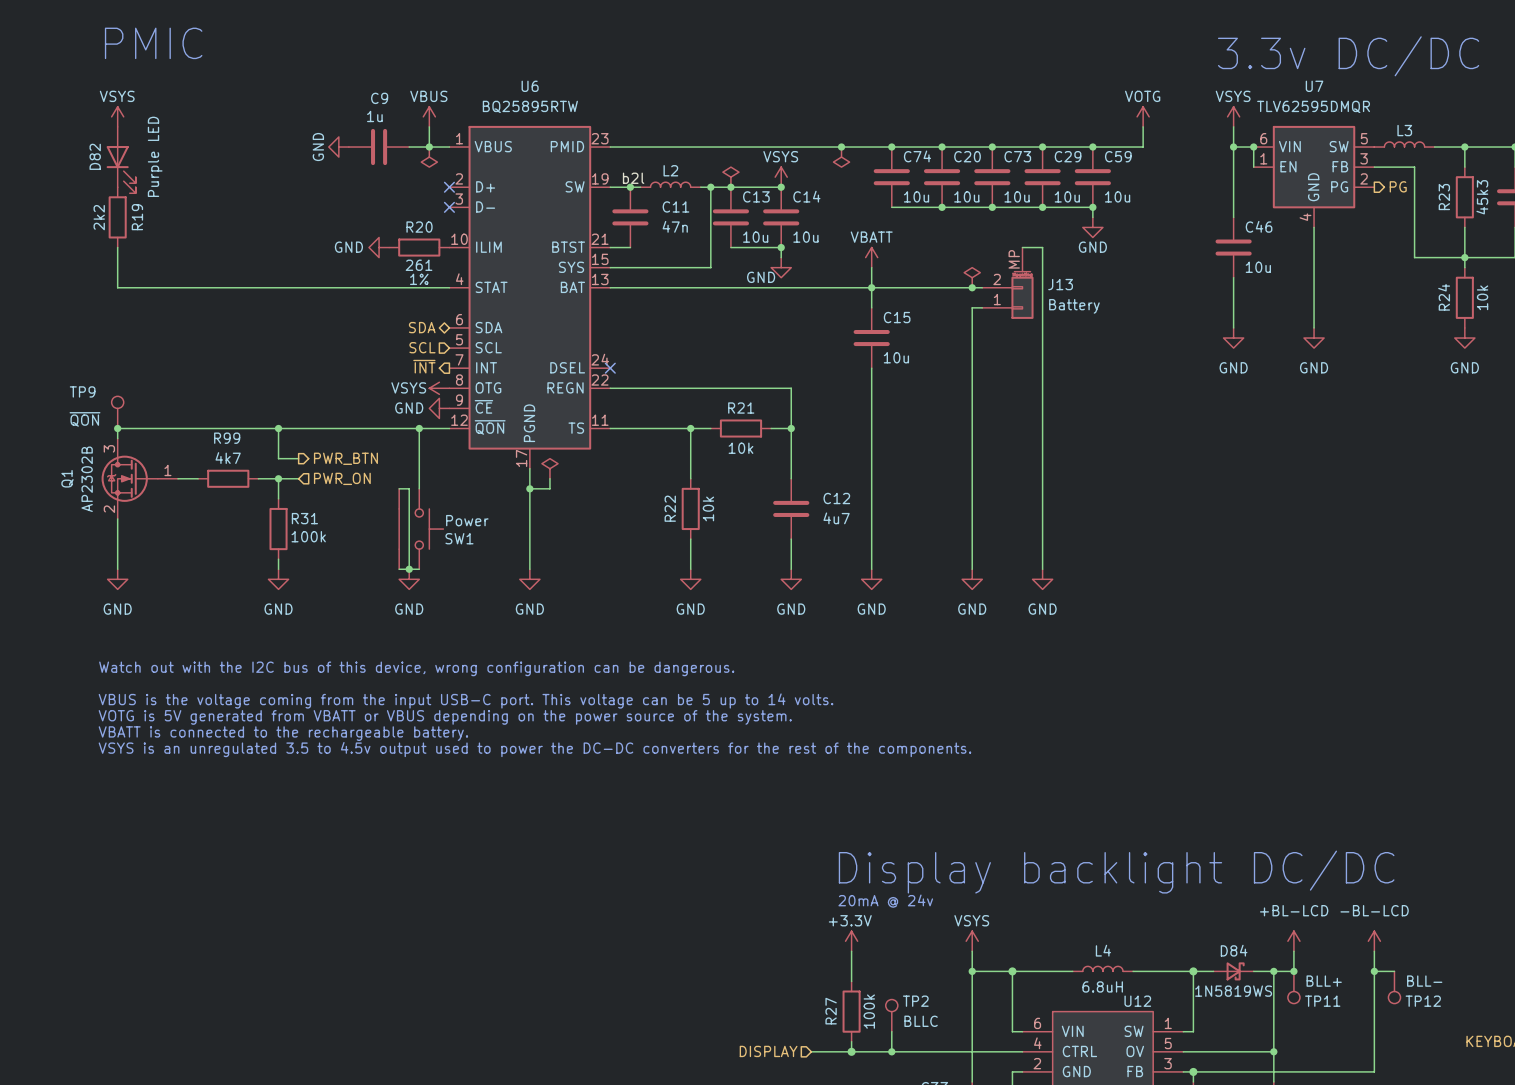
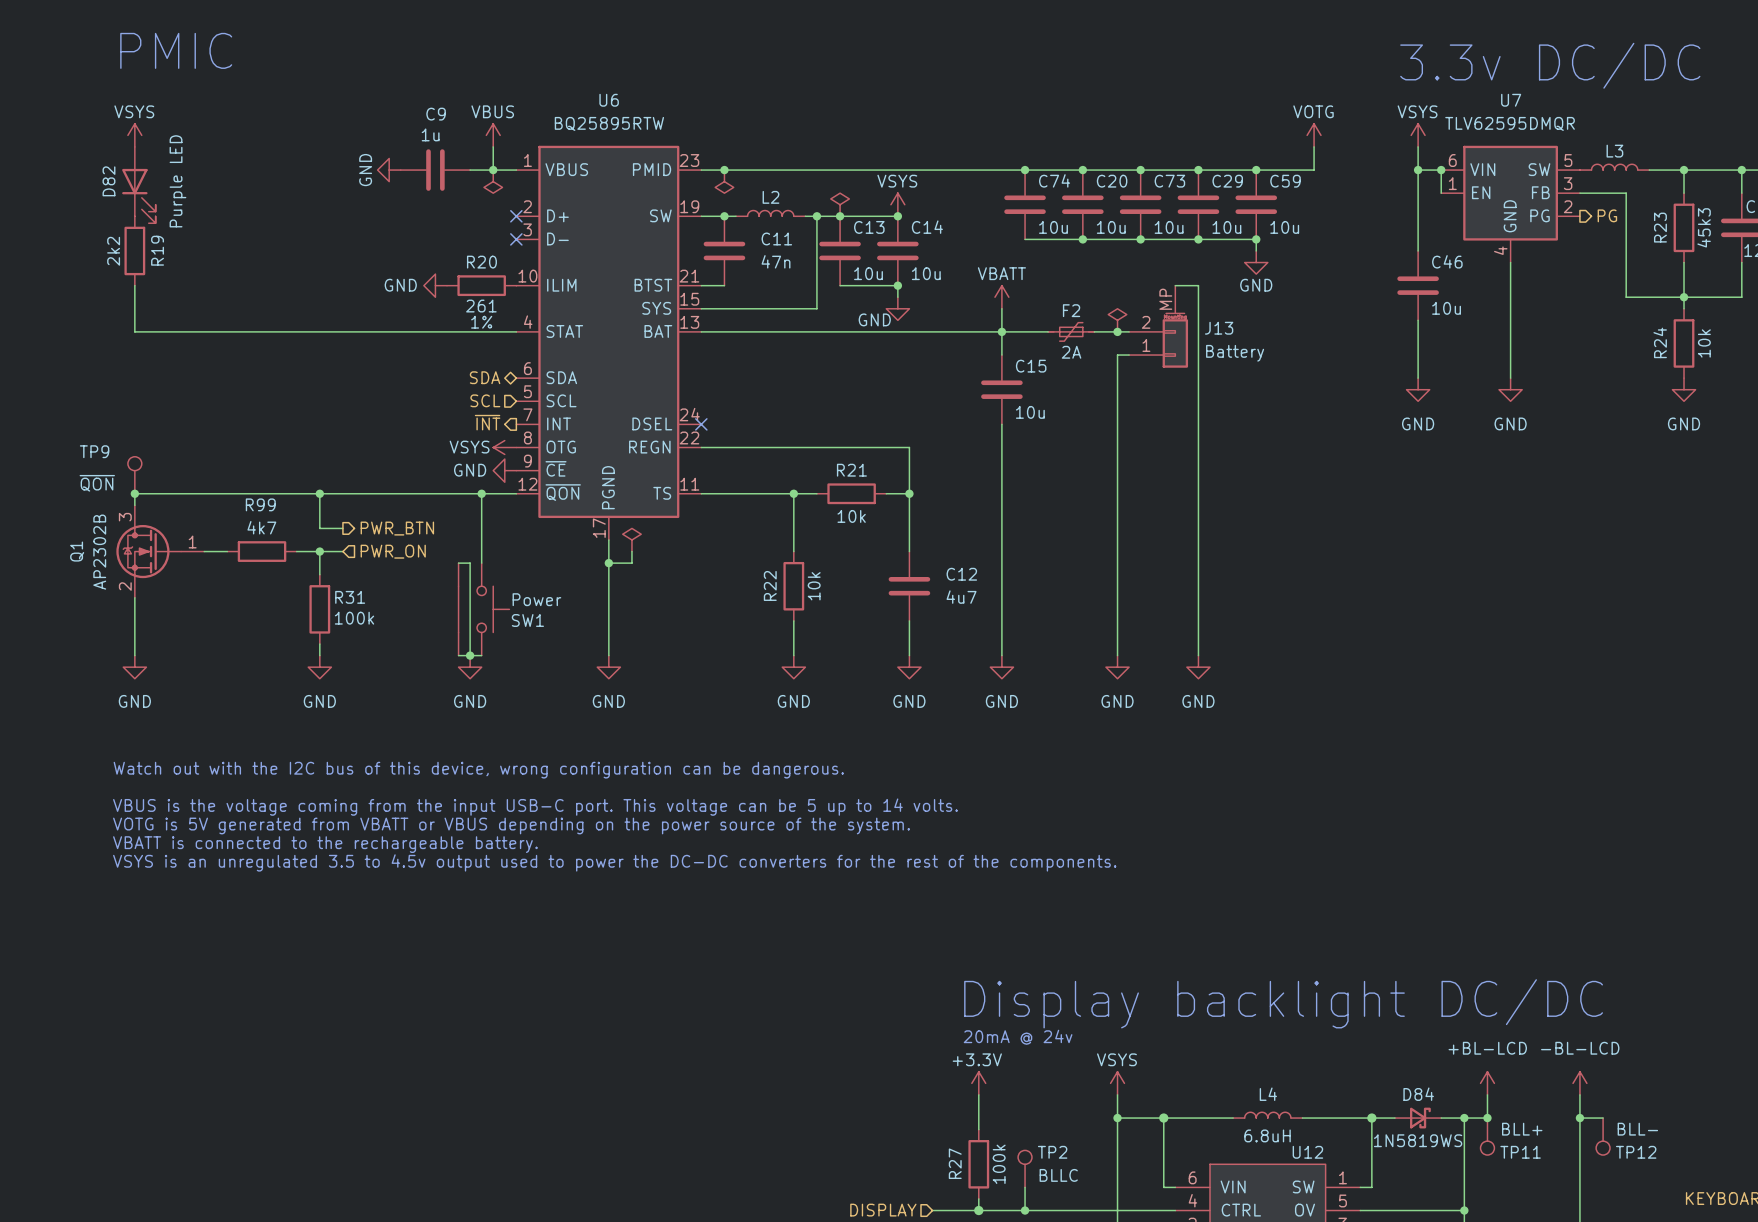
junction: none -> (724, 170)
junction: (841, 147) -> none
power symbol: none -> (724, 181)
power symbol: (841, 157) -> none
label: b2l (633, 178) -> none
F2: none -> 2A (1071, 331)

